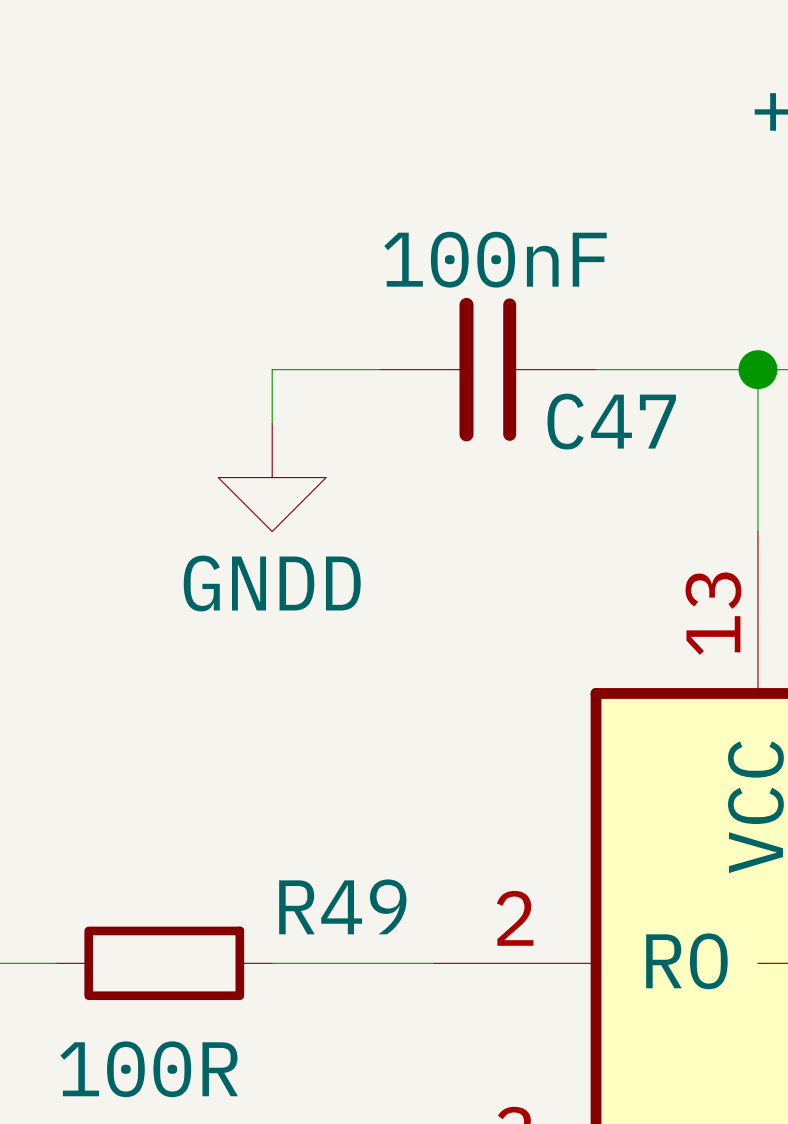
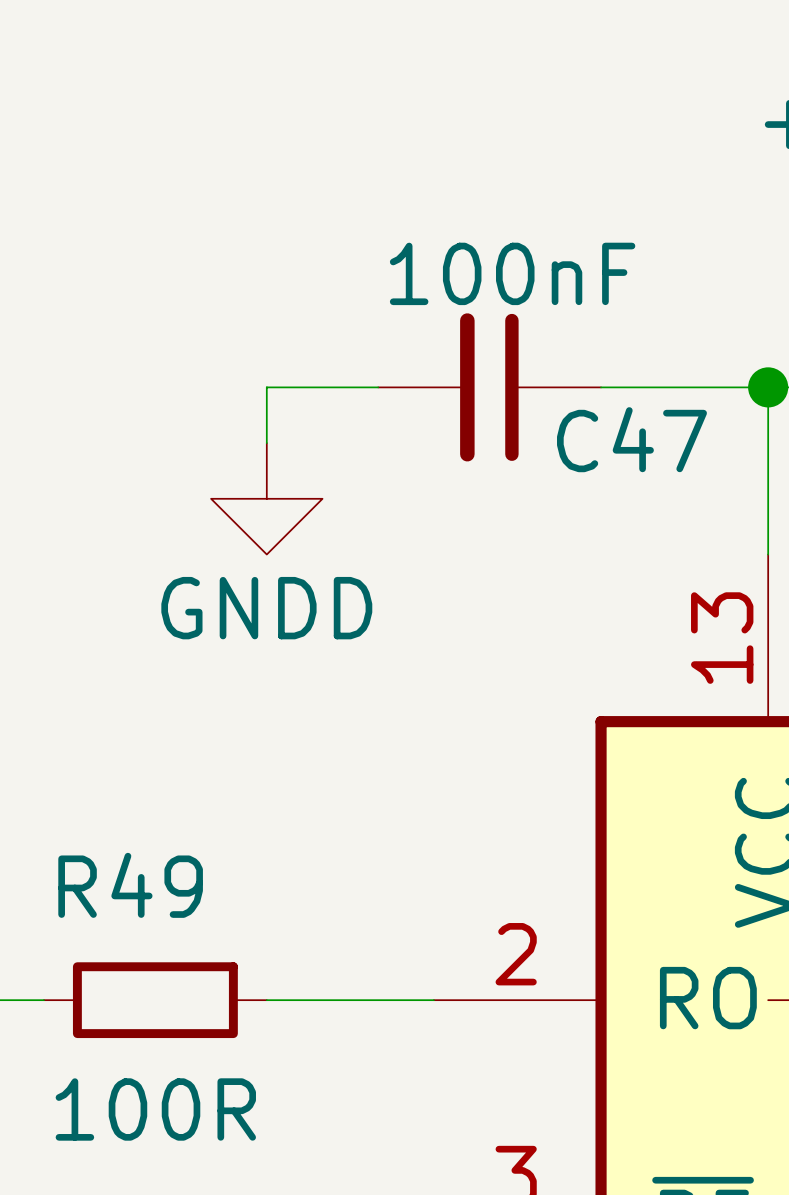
R49 name position: R49 (342, 906) -> R49 (130, 885)

